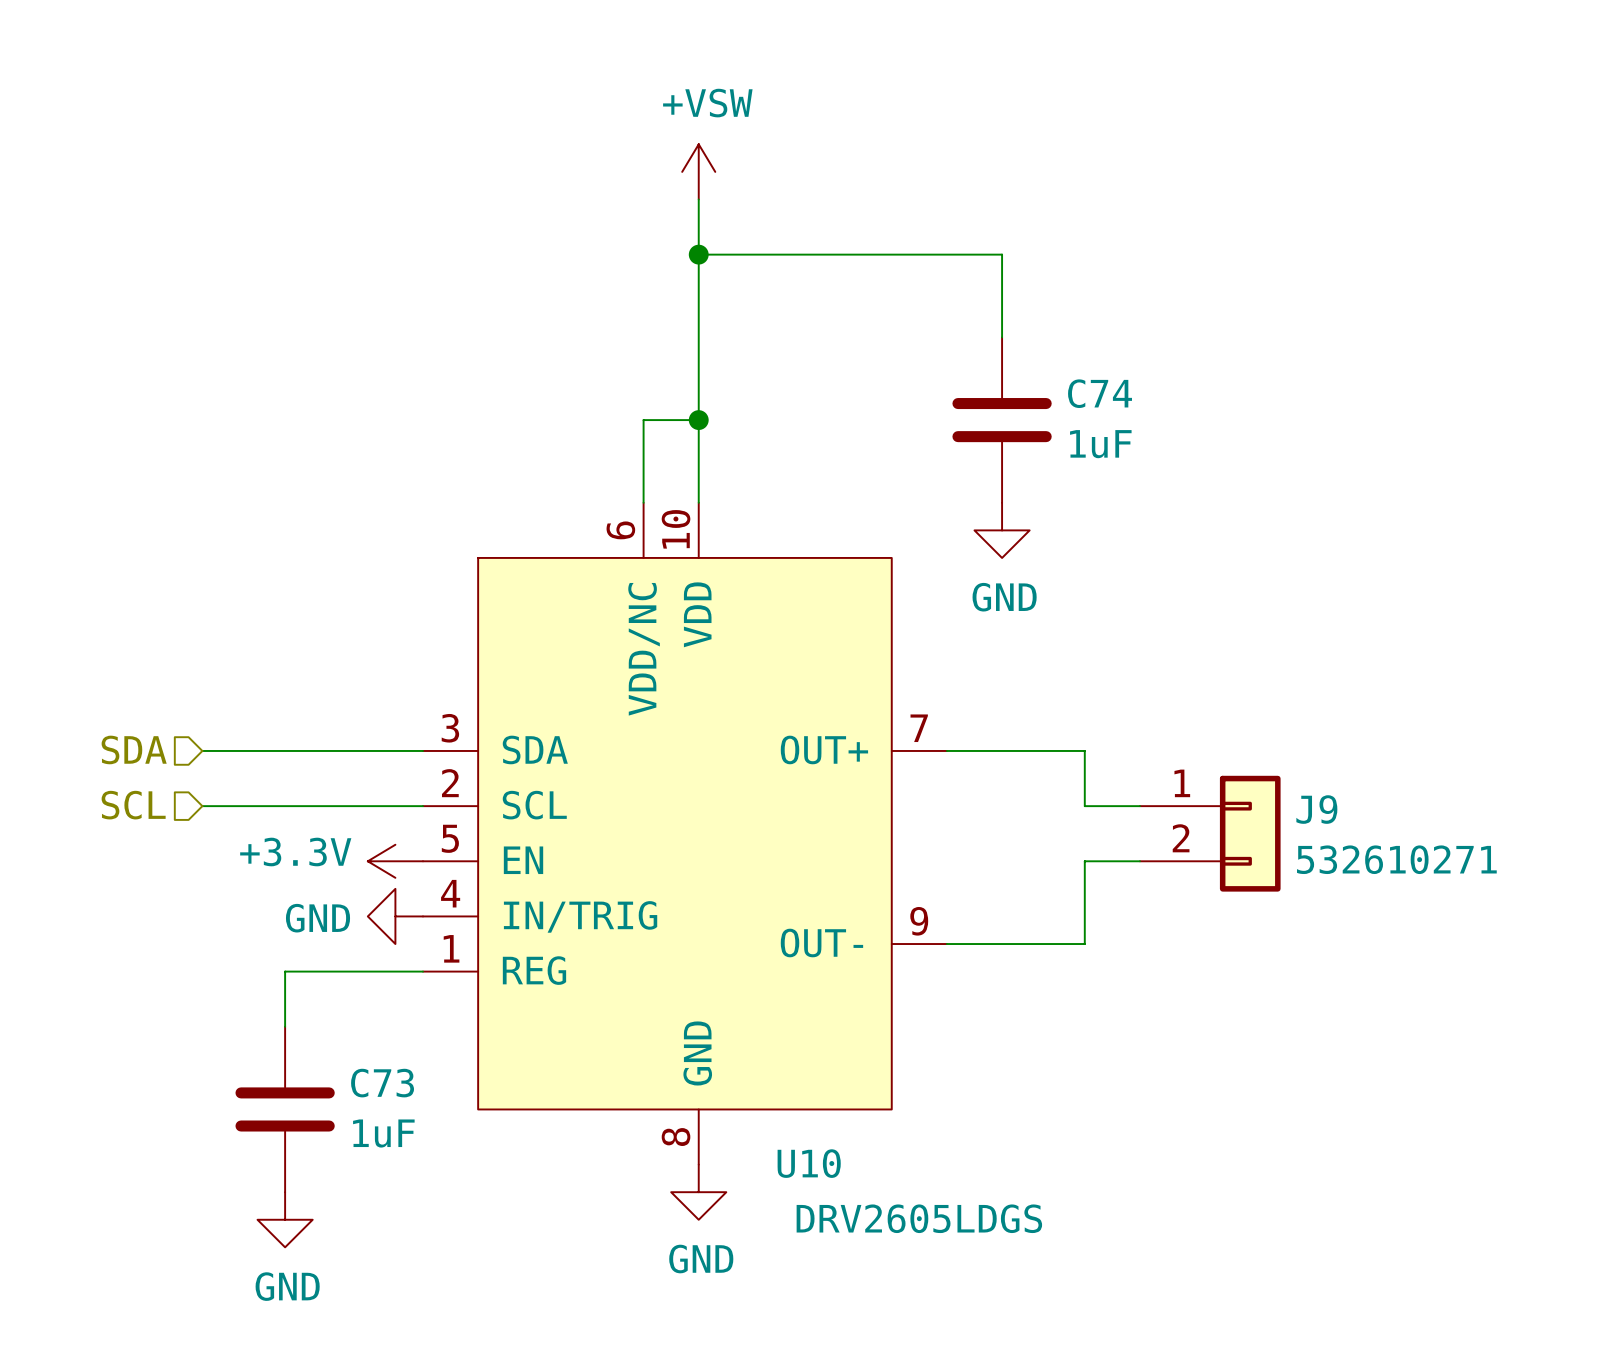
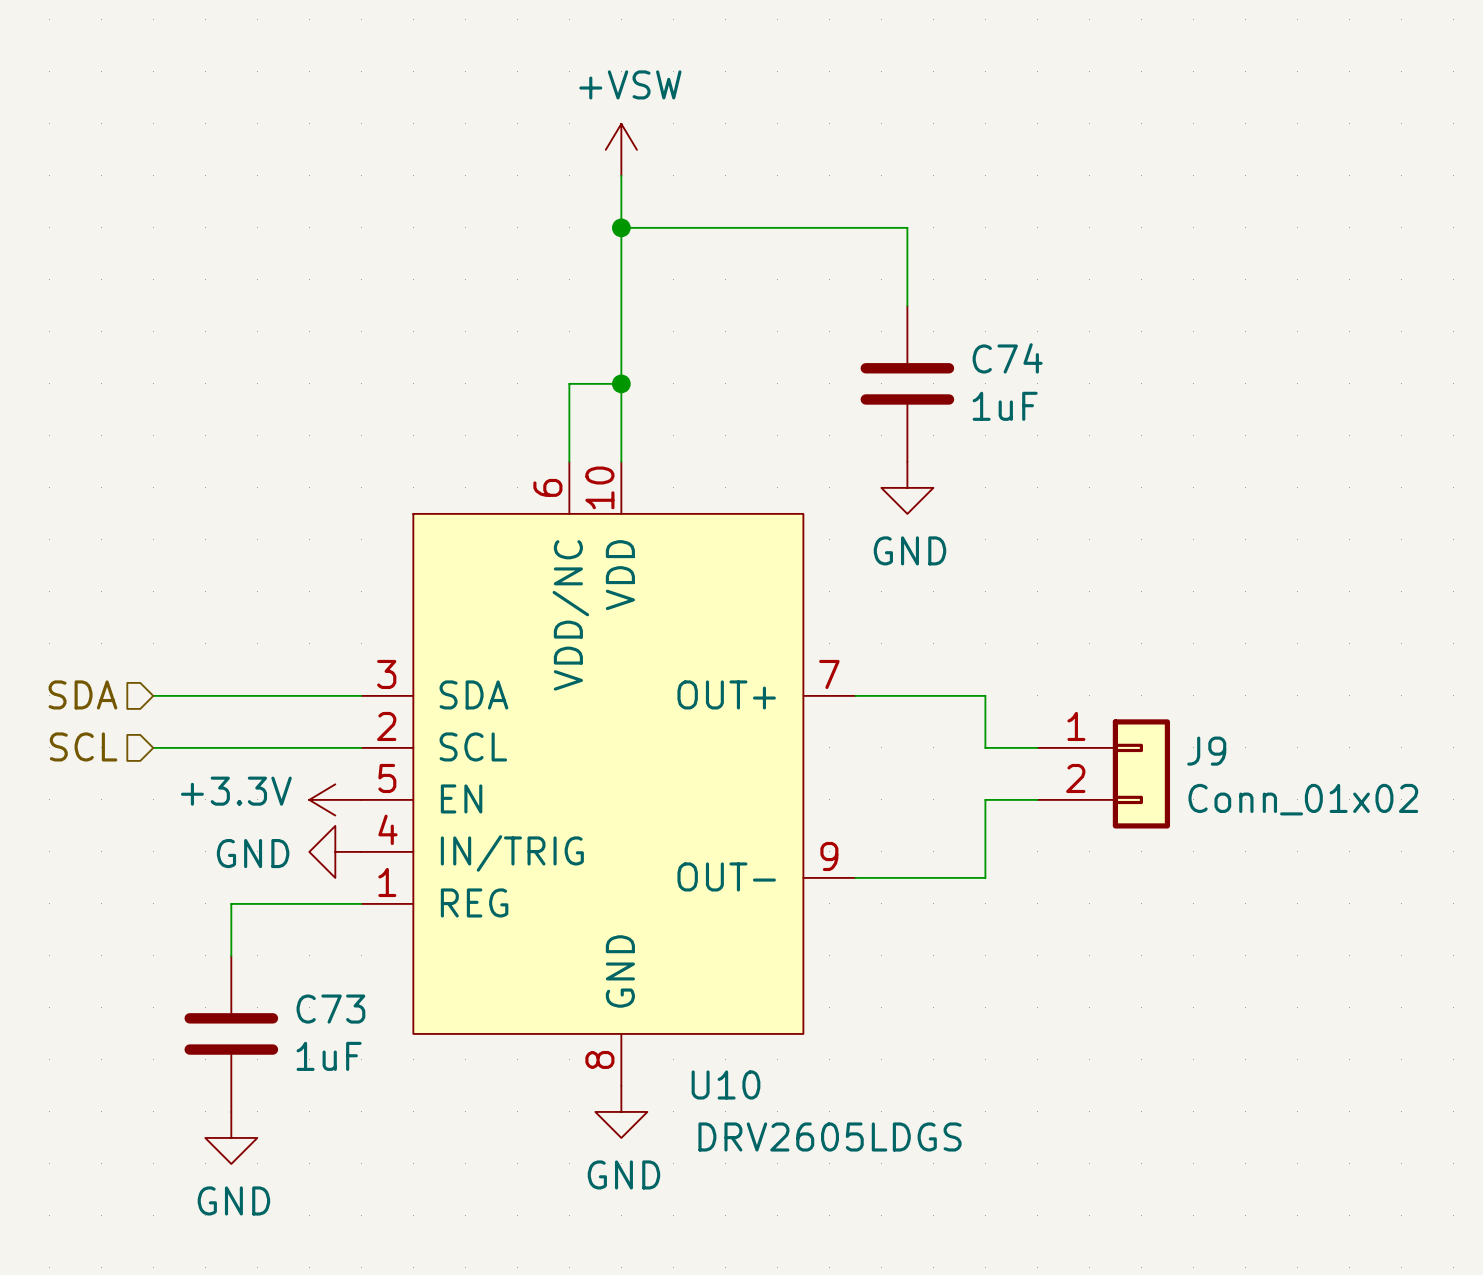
J9 value: 532610271 (1396, 859) -> Conn_01x02 (1303, 799)

